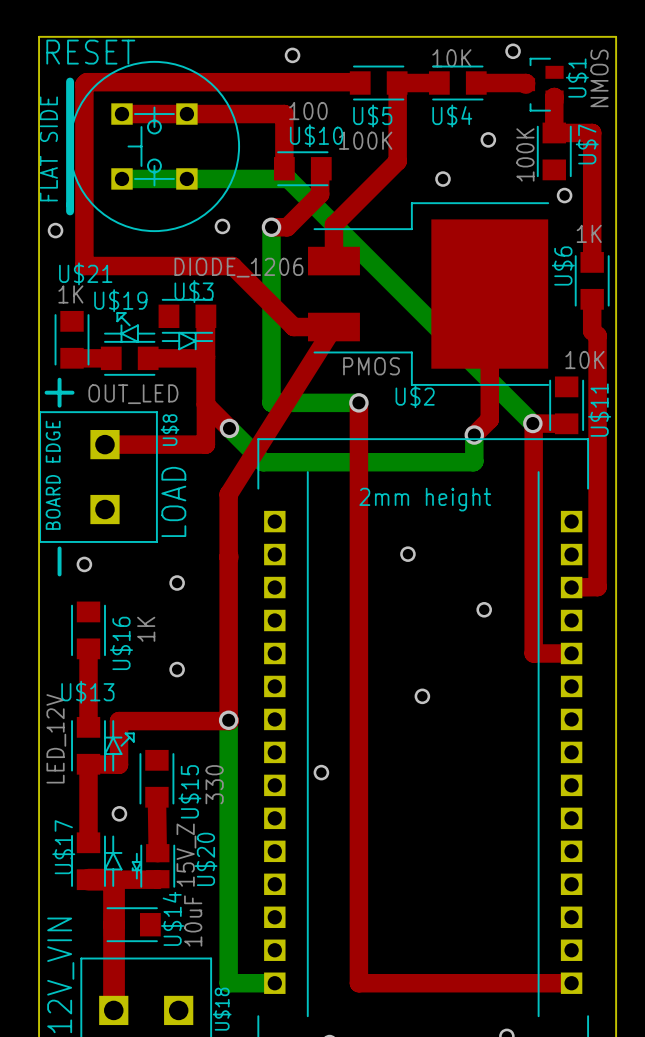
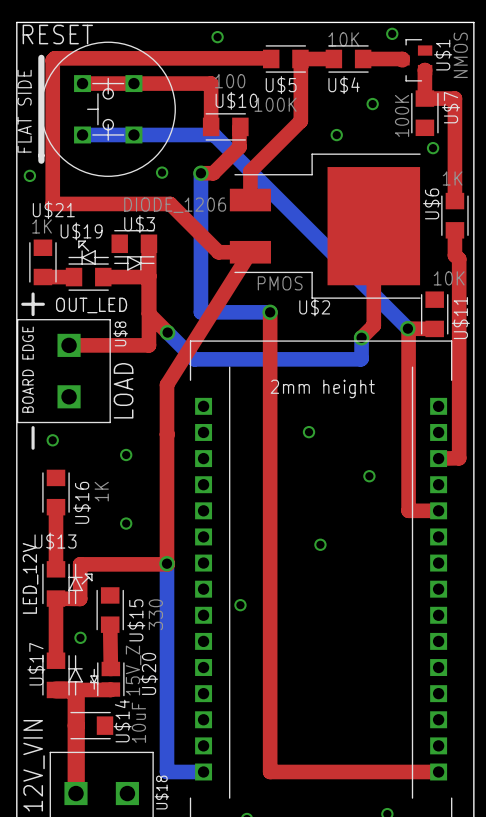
text: none -> OUT_LED (91, 305)
text: none -> LED_12V (30, 578)

